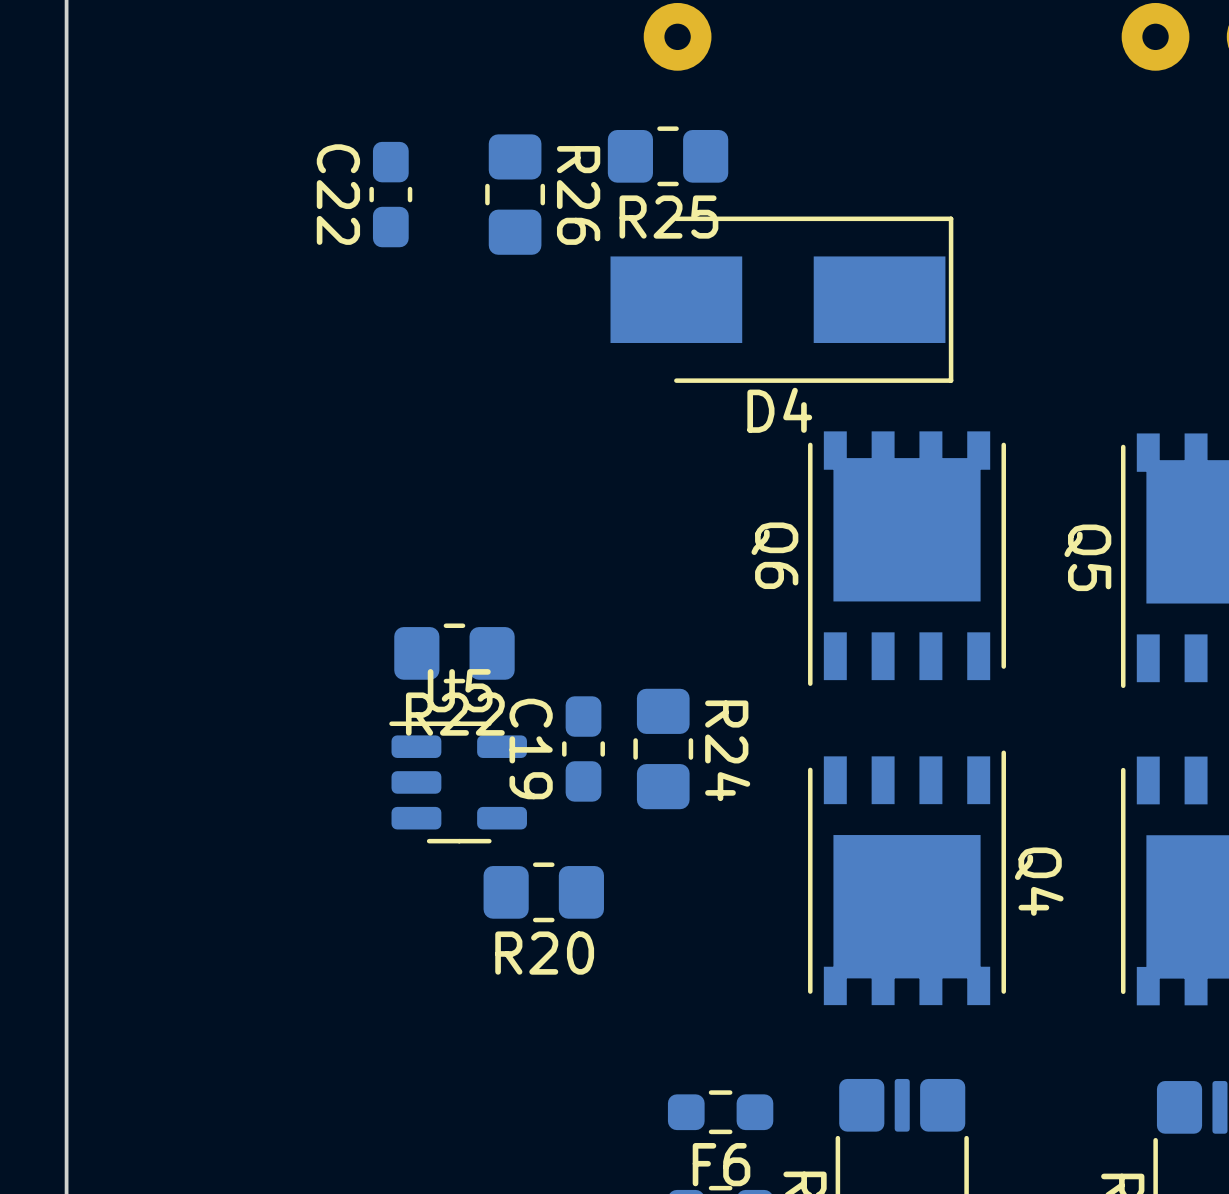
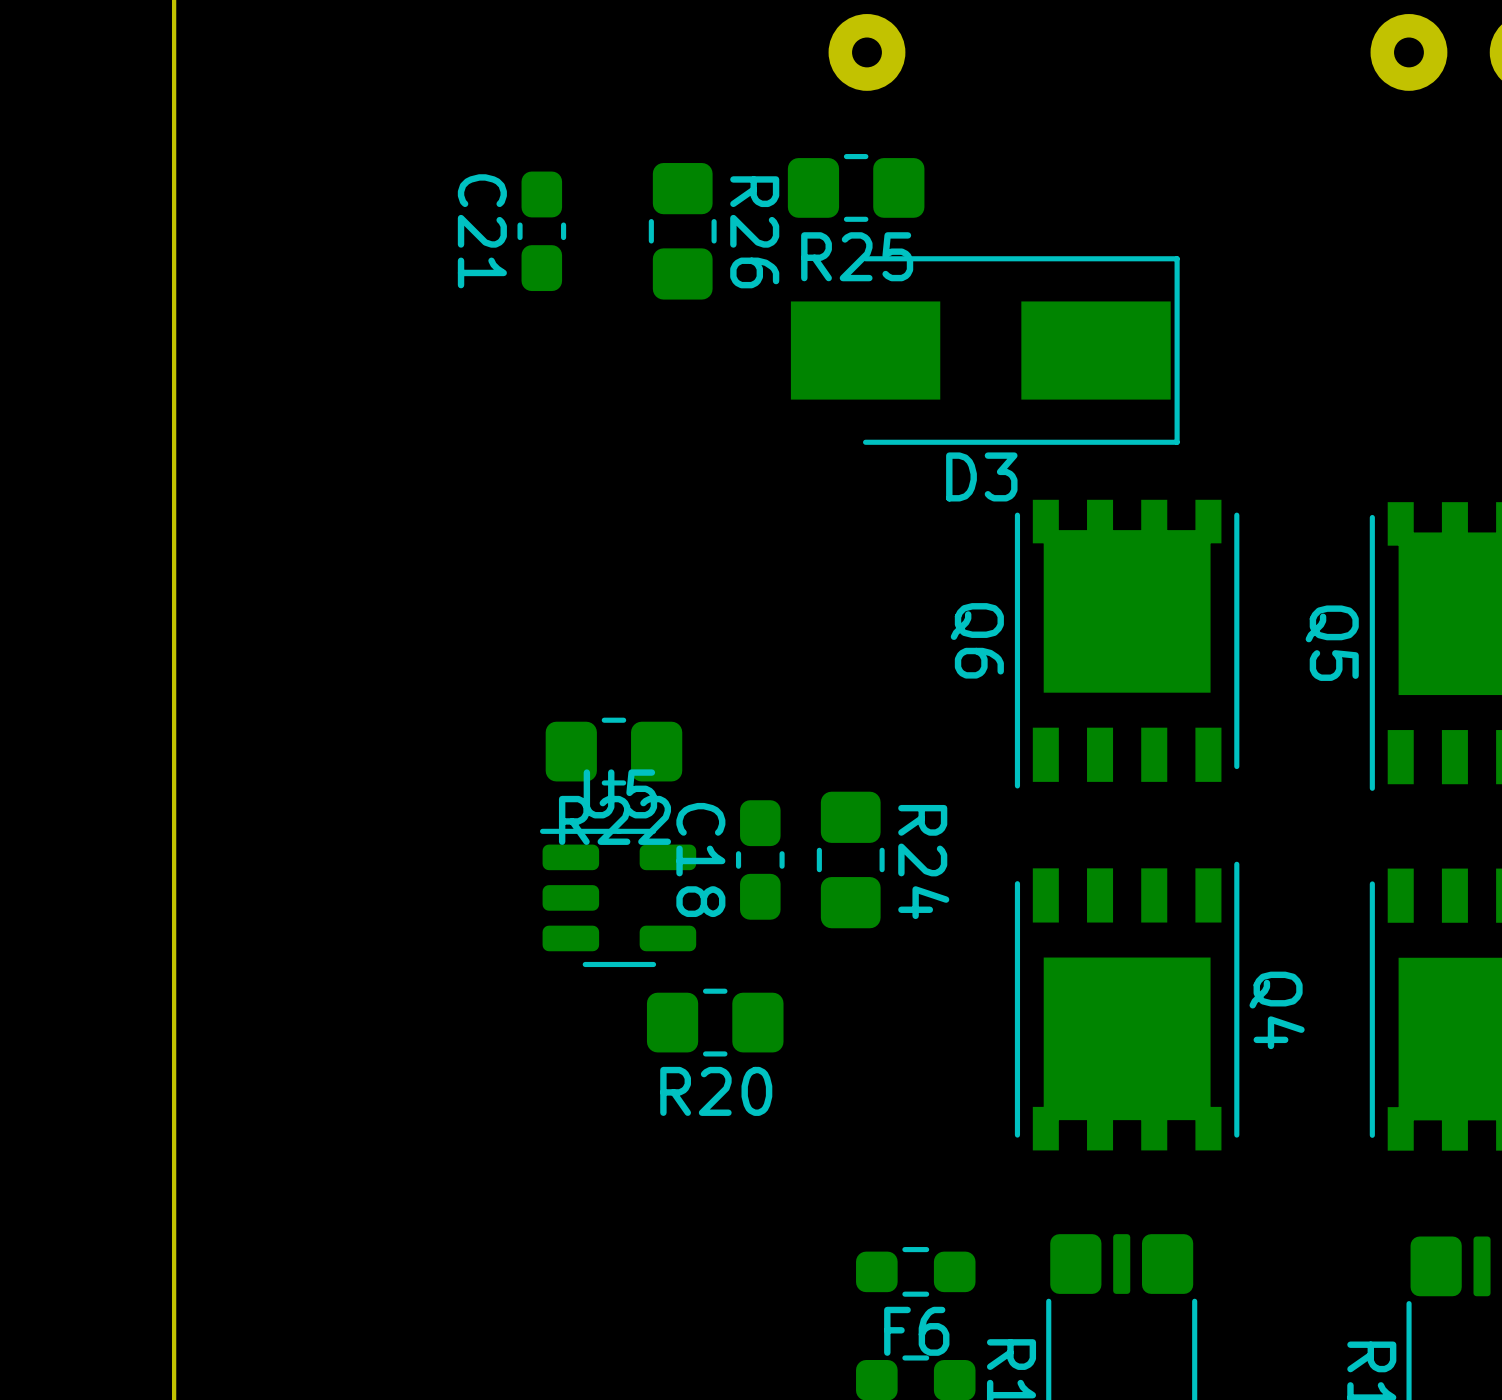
C22 name: C22 (338, 194) -> C21 (482, 231)
D4 name: D4 (779, 410) -> D3 (981, 476)
C19 name: C19 (531, 748) -> C18 (700, 859)

